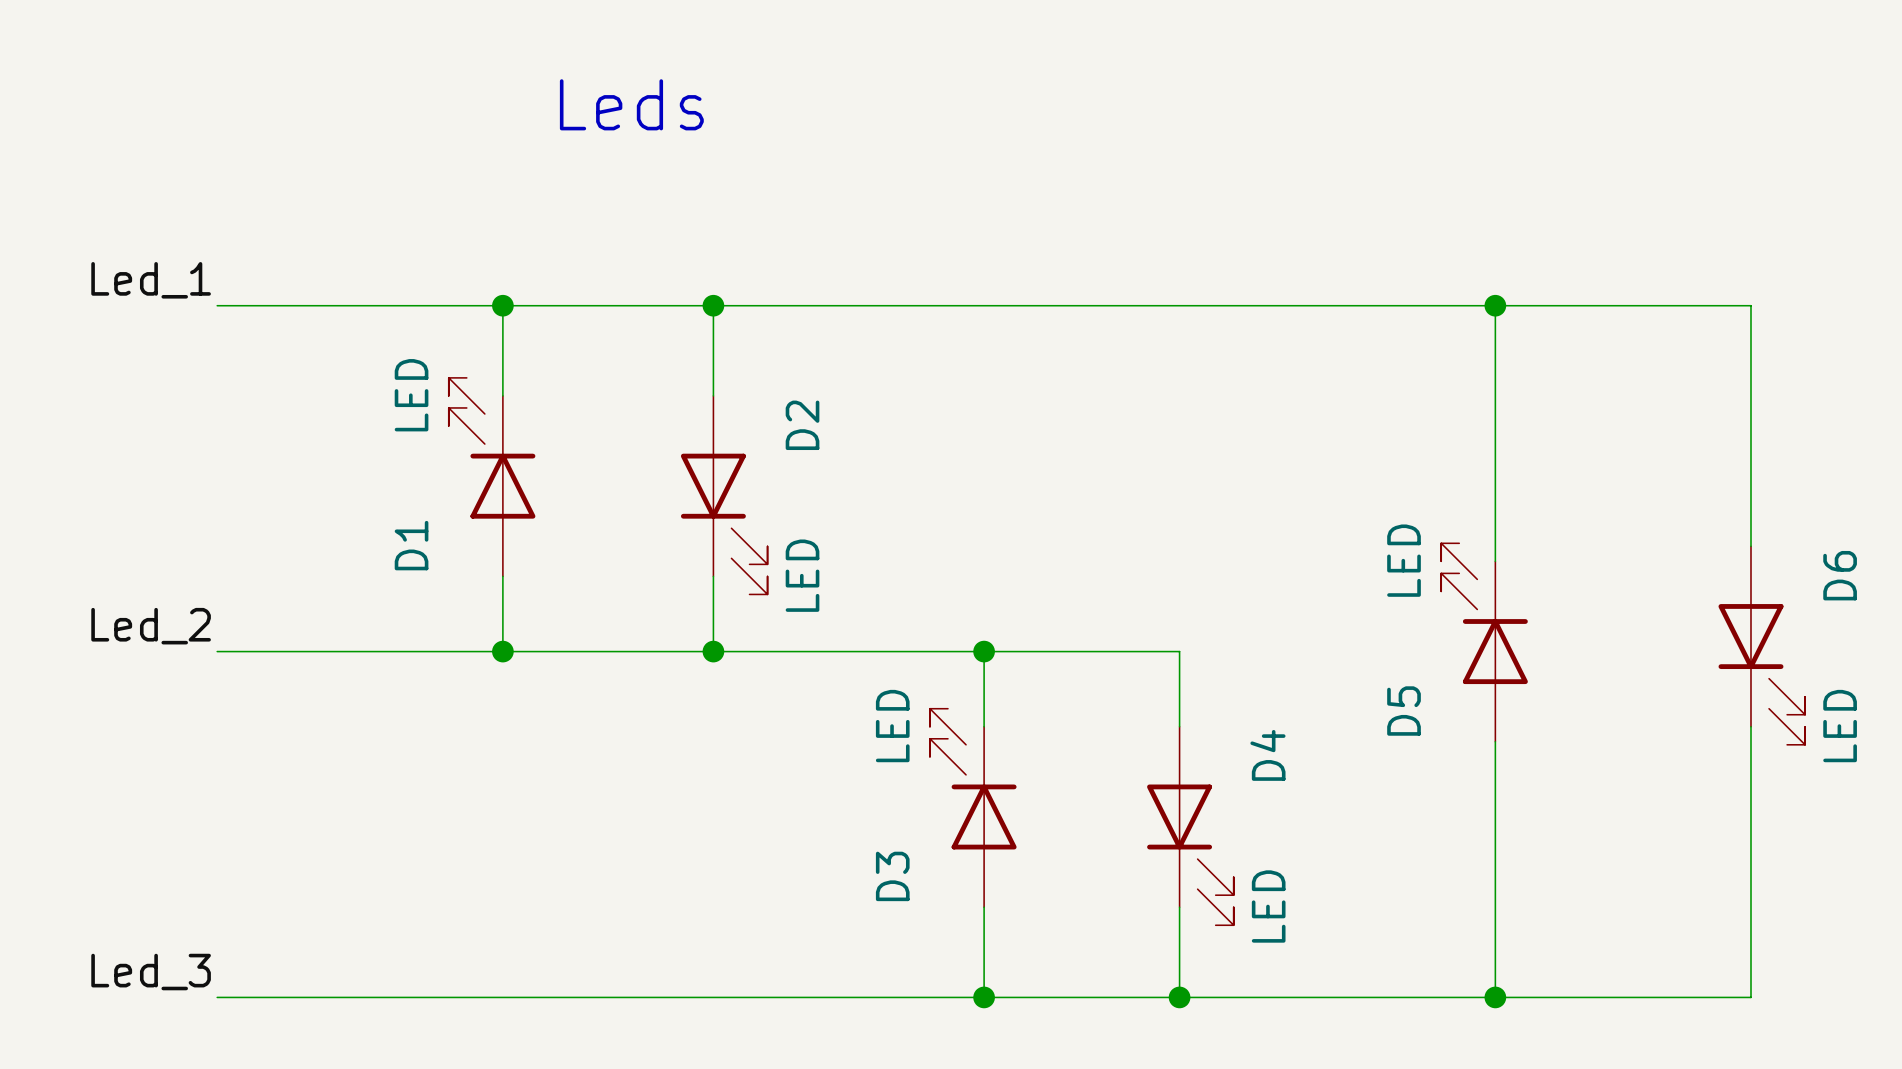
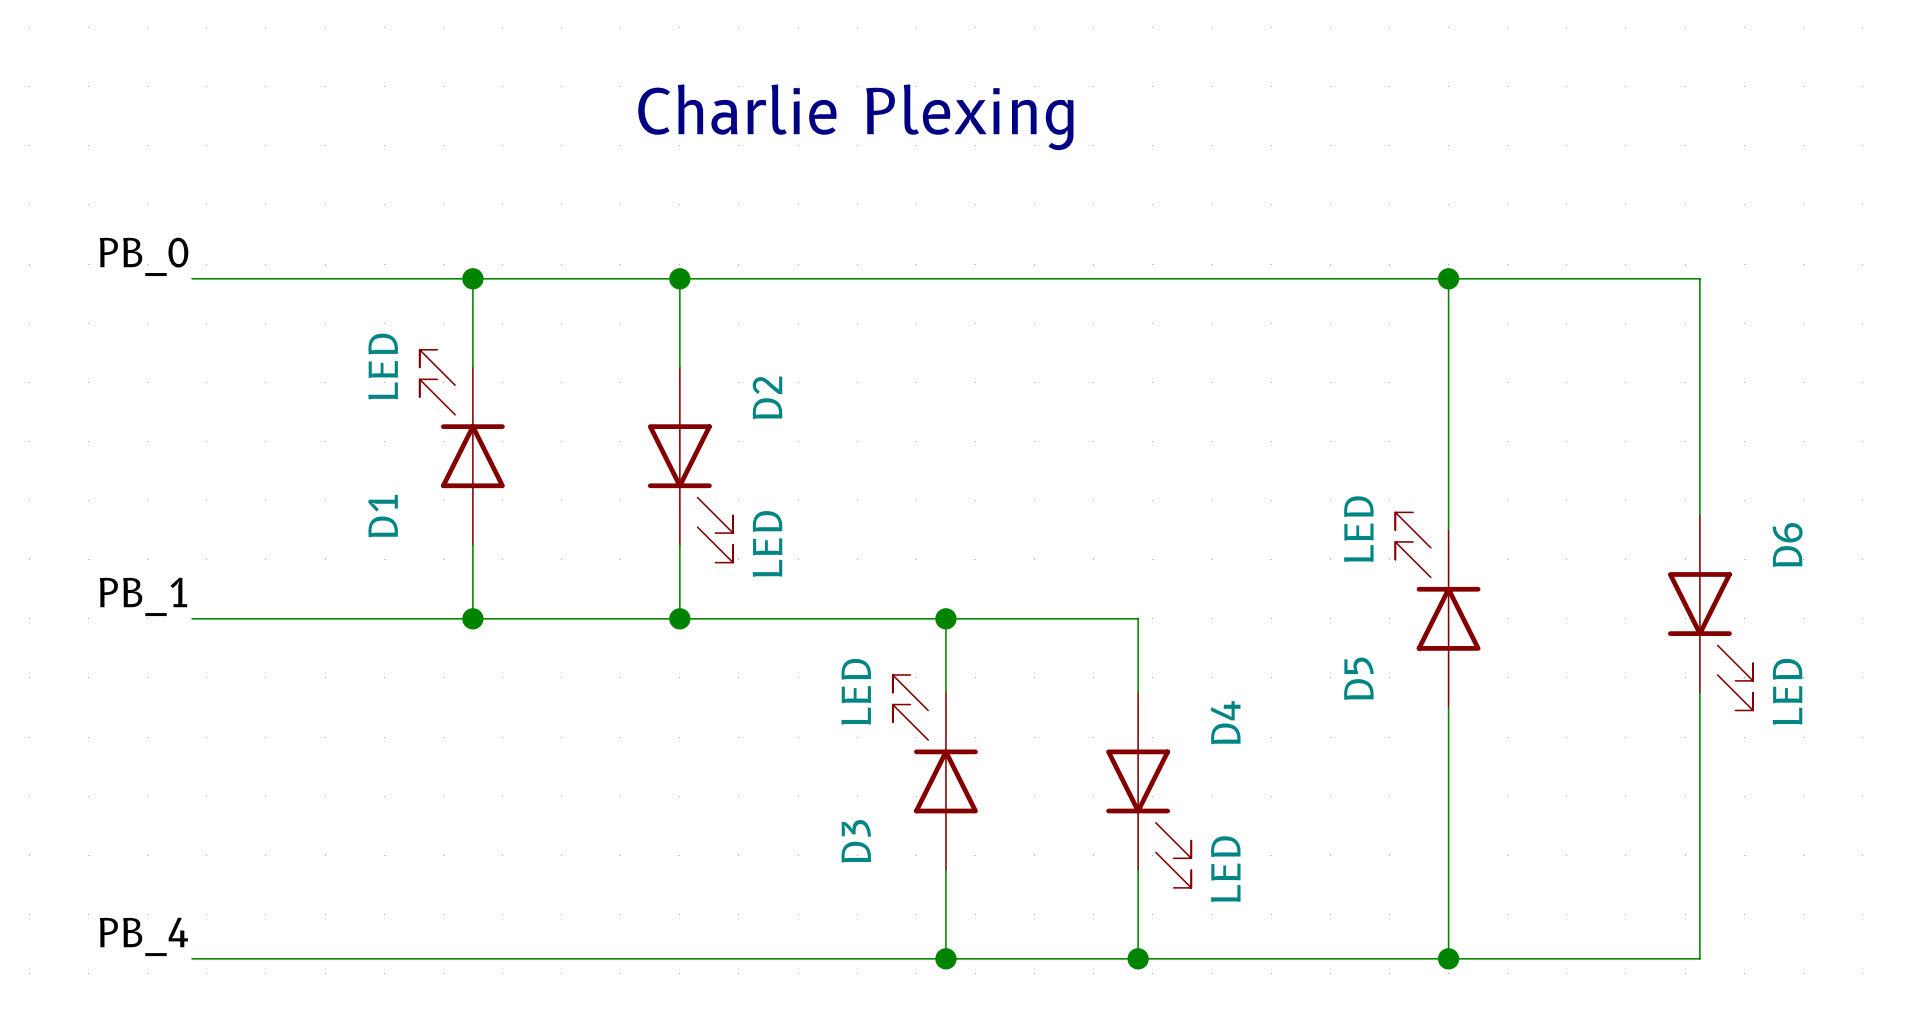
text: Leds (631, 104) -> none
text: none -> Charlie Plexing (855, 117)
label: Led_1 (151, 280) -> PB_0 (144, 256)
label: Led_2 (151, 626) -> PB_1 (143, 596)
label: Led_3 (151, 972) -> PB_4 (143, 936)

